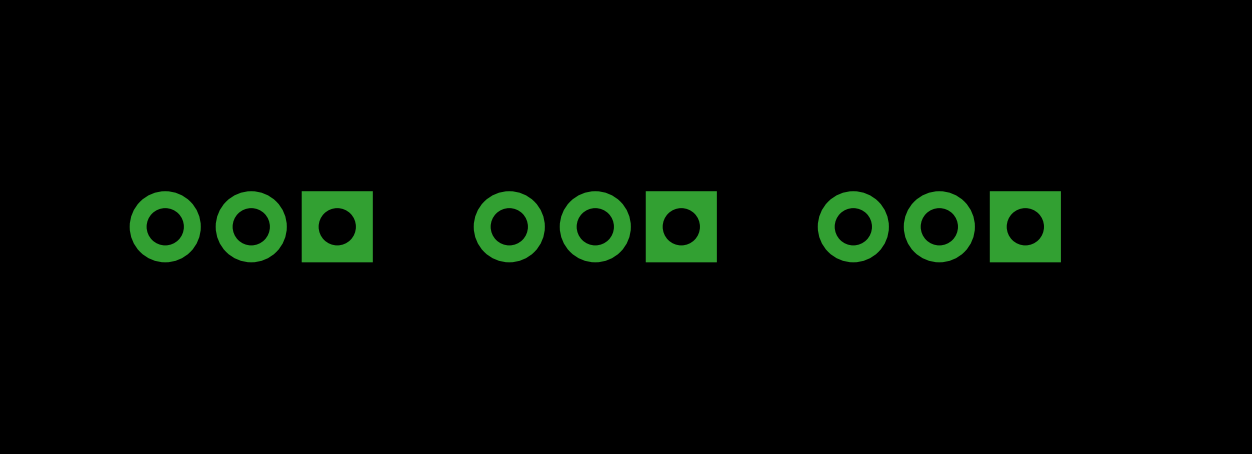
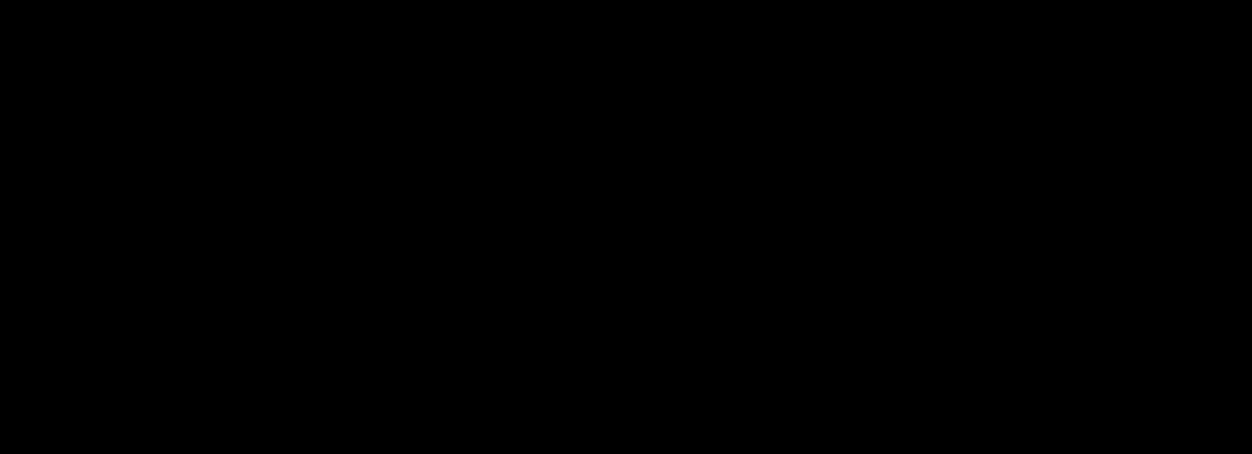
part: (251, 226) -> none
part: (595, 226) -> none
part: (939, 226) -> none

